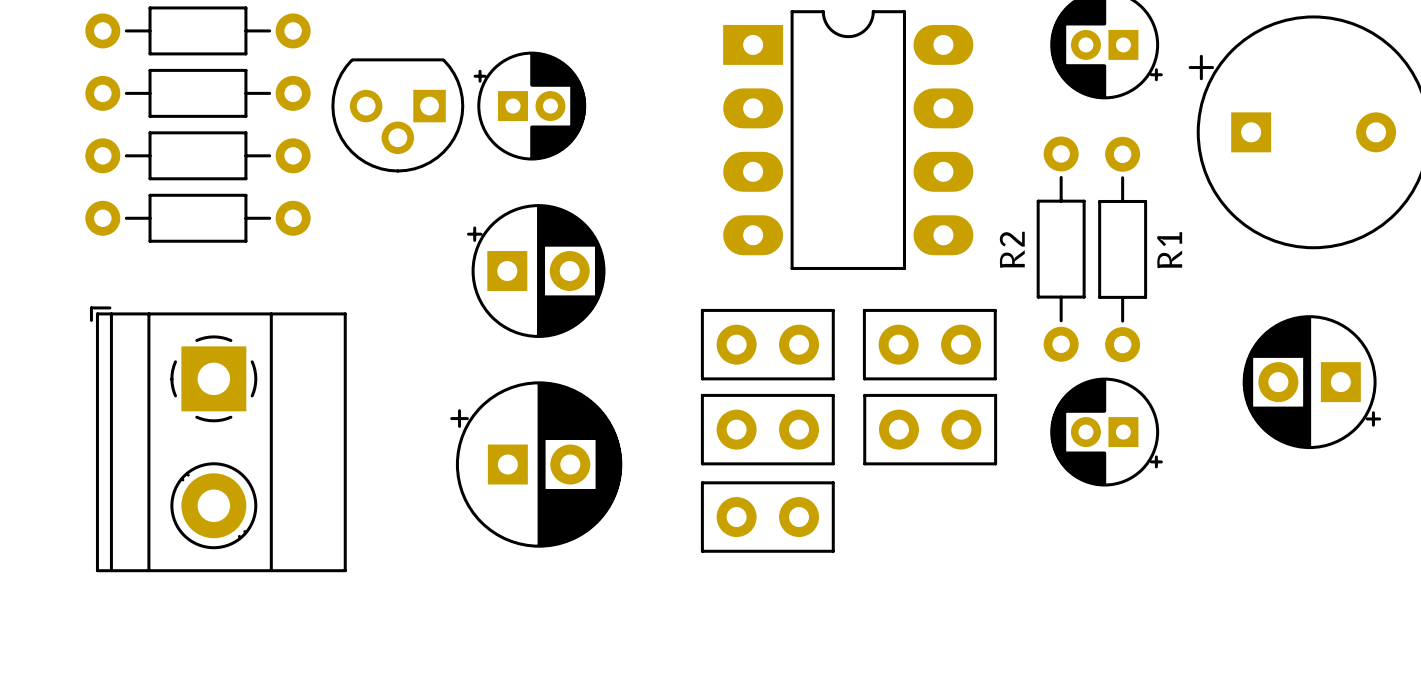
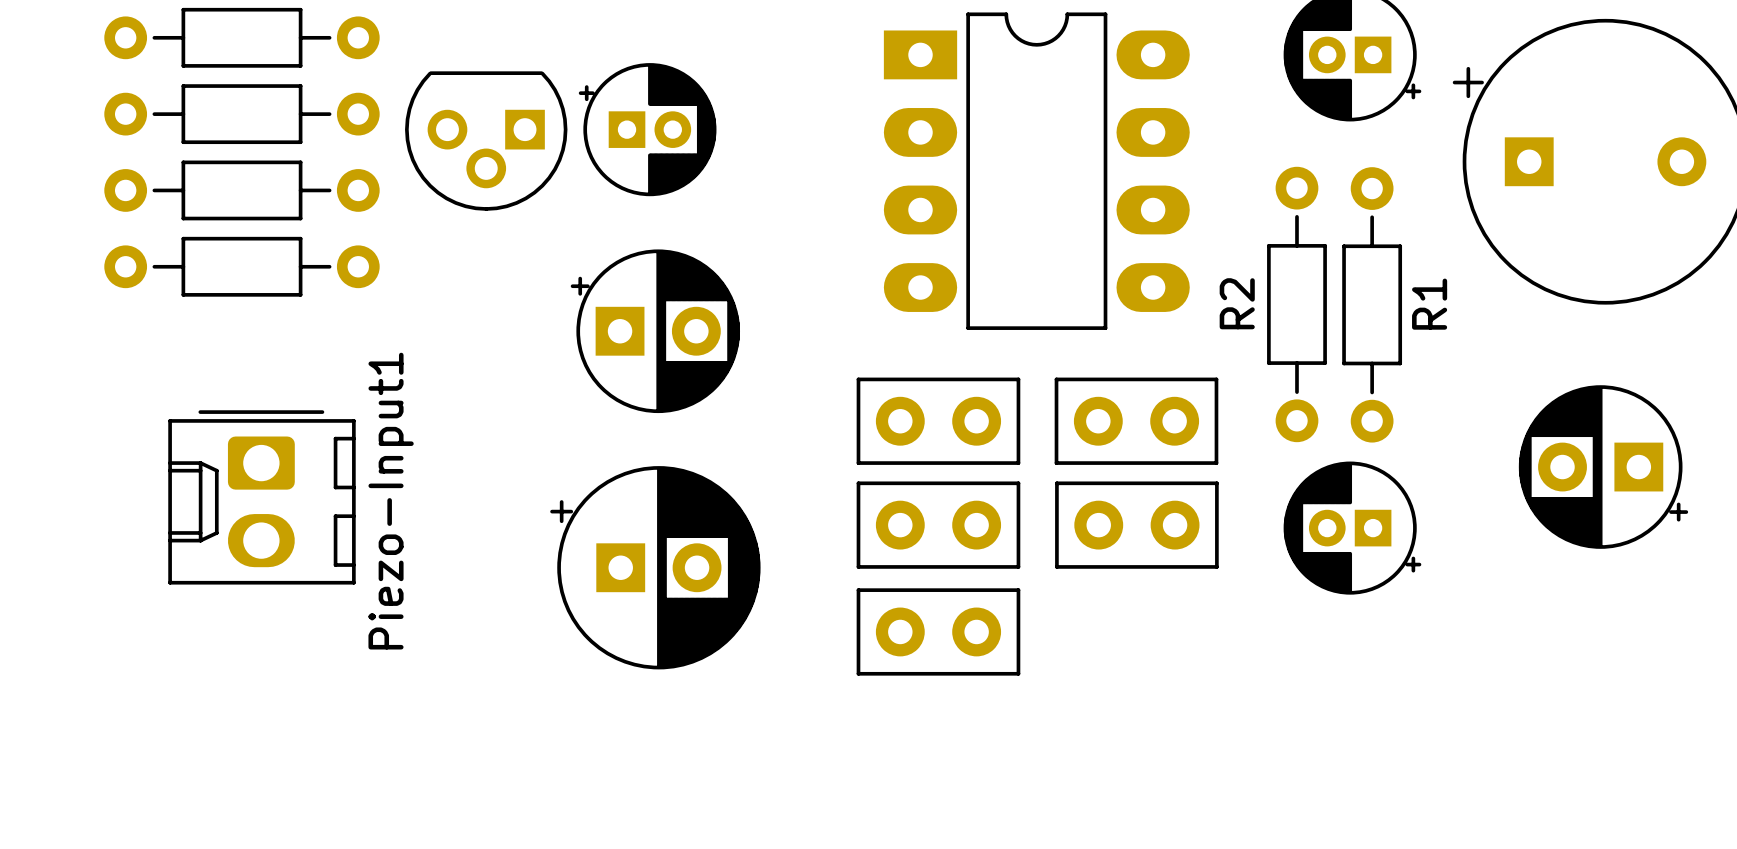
Piezo-Input1: none -> (261, 497)
part: (218, 439) -> none

